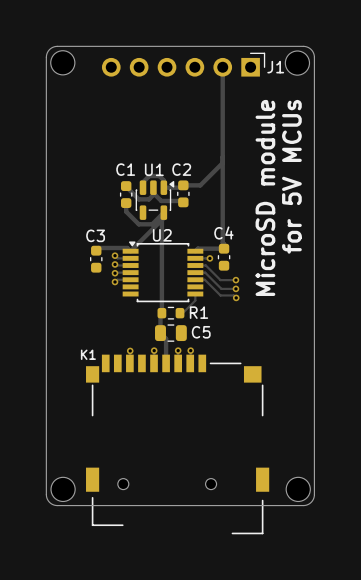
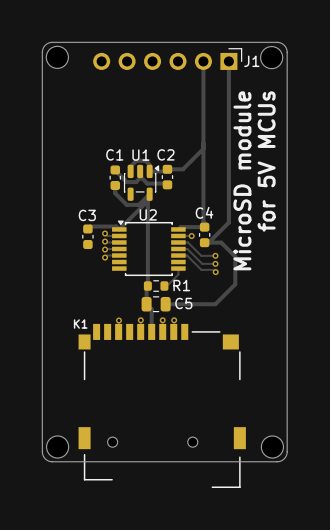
track: none -> (228, 61) (228, 222) (208, 242)
track: none -> (204, 242) (221, 242) (235, 256) (235, 284) (215, 304) (163, 304)

